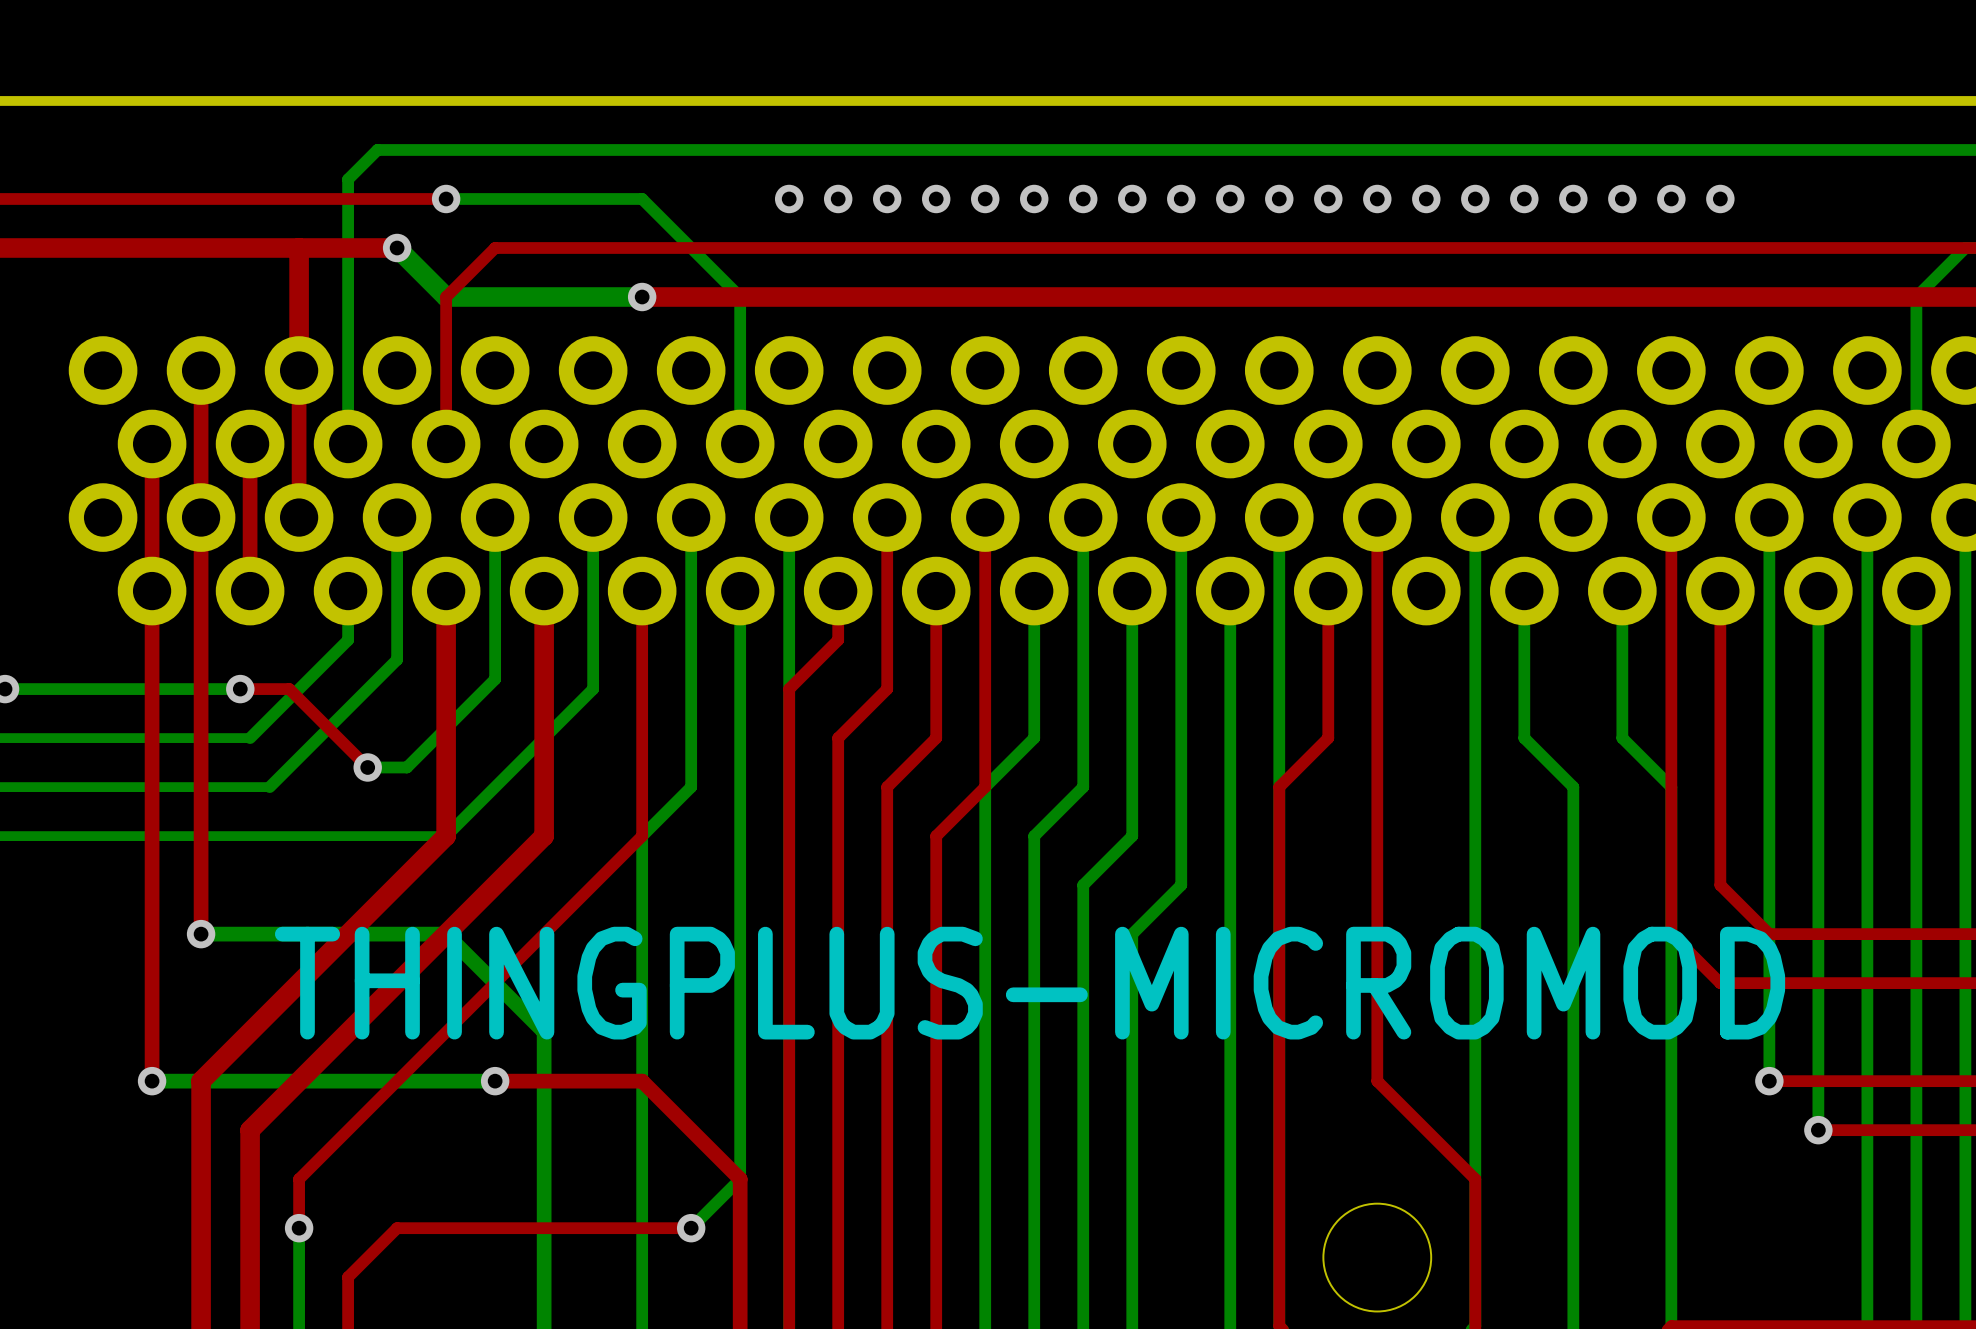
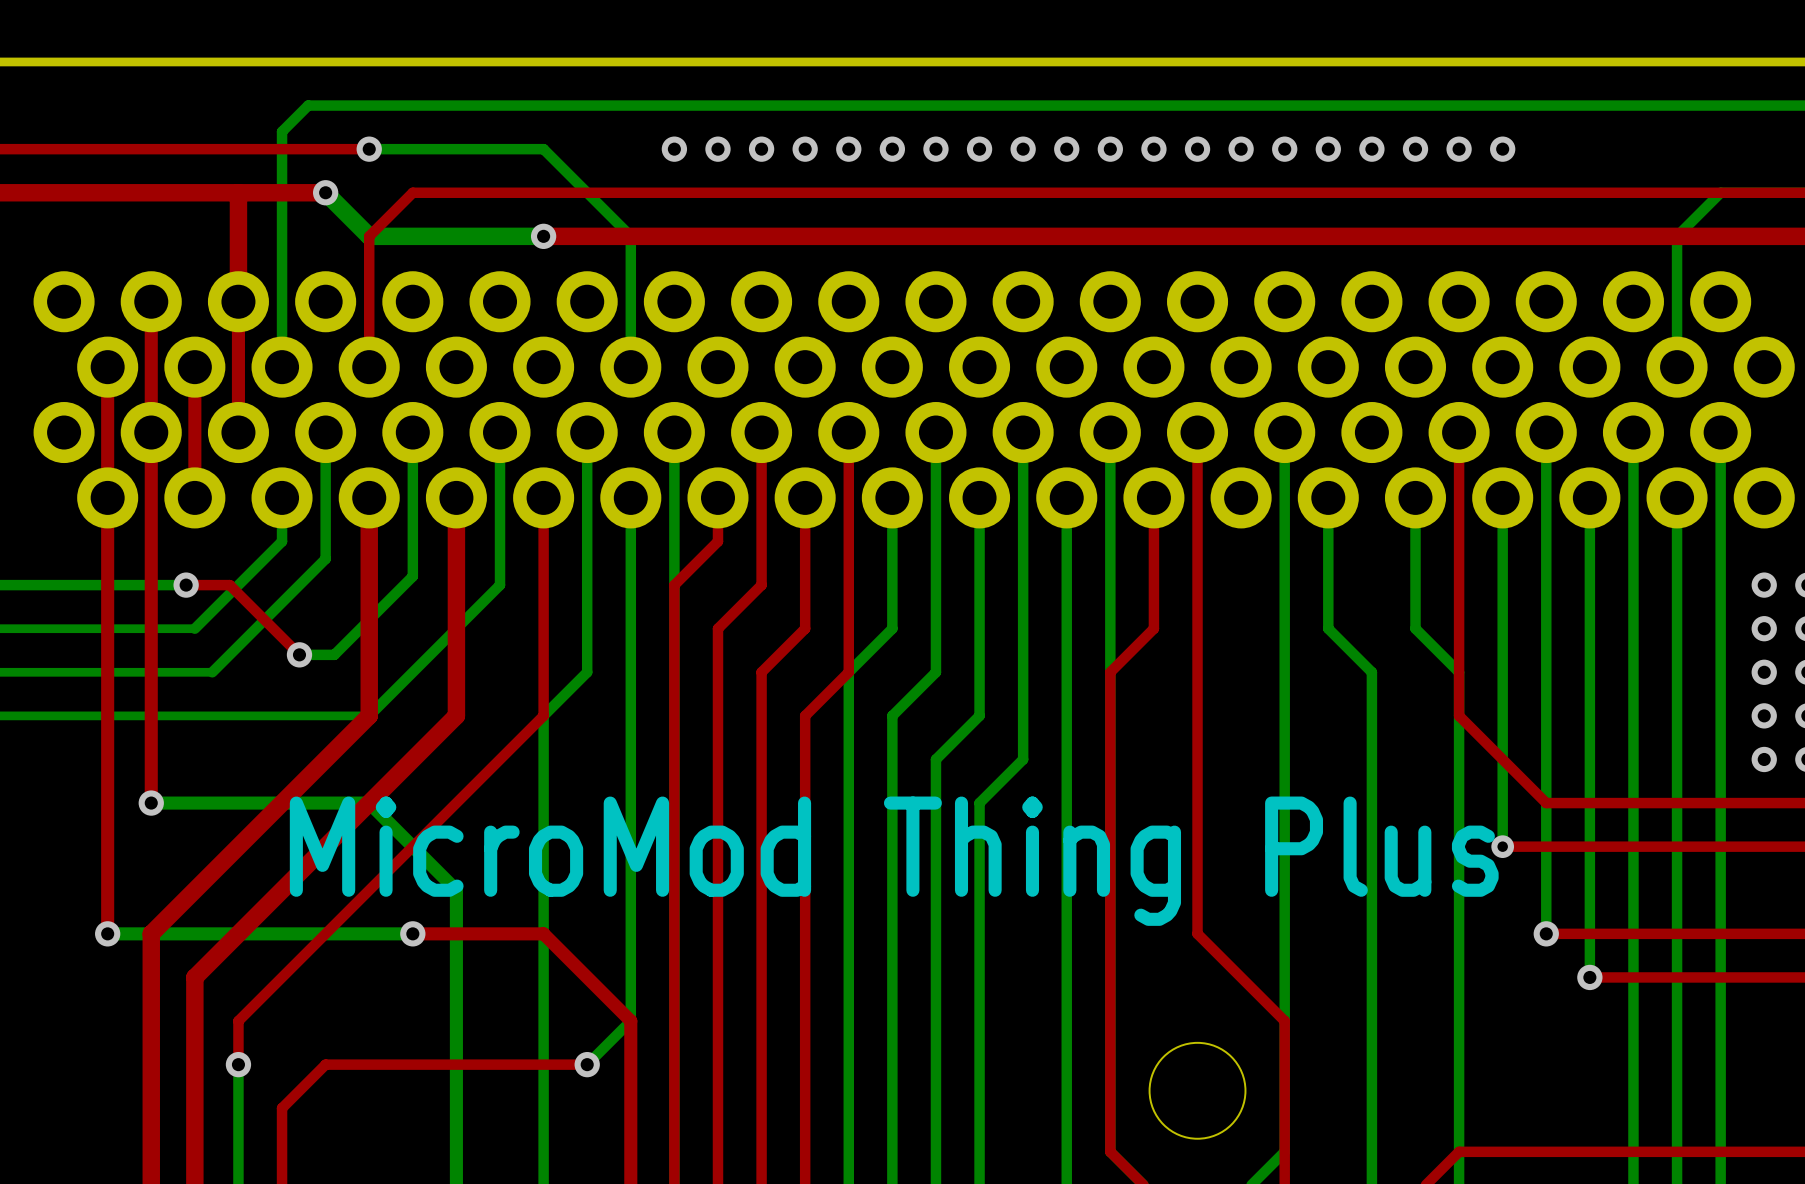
top track: (1720, 591) (1720, 885) -> none
bottom track: none -> (1502, 497) (1502, 846)
top track: (1671, 836) (1671, 934) (1720, 983) -> (1459, 715) (1502, 759)
text: THINGPLUS-MICROMOD (1030, 983) -> MicroMod Thing Plus (894, 861)
via: none -> (1502, 846)

